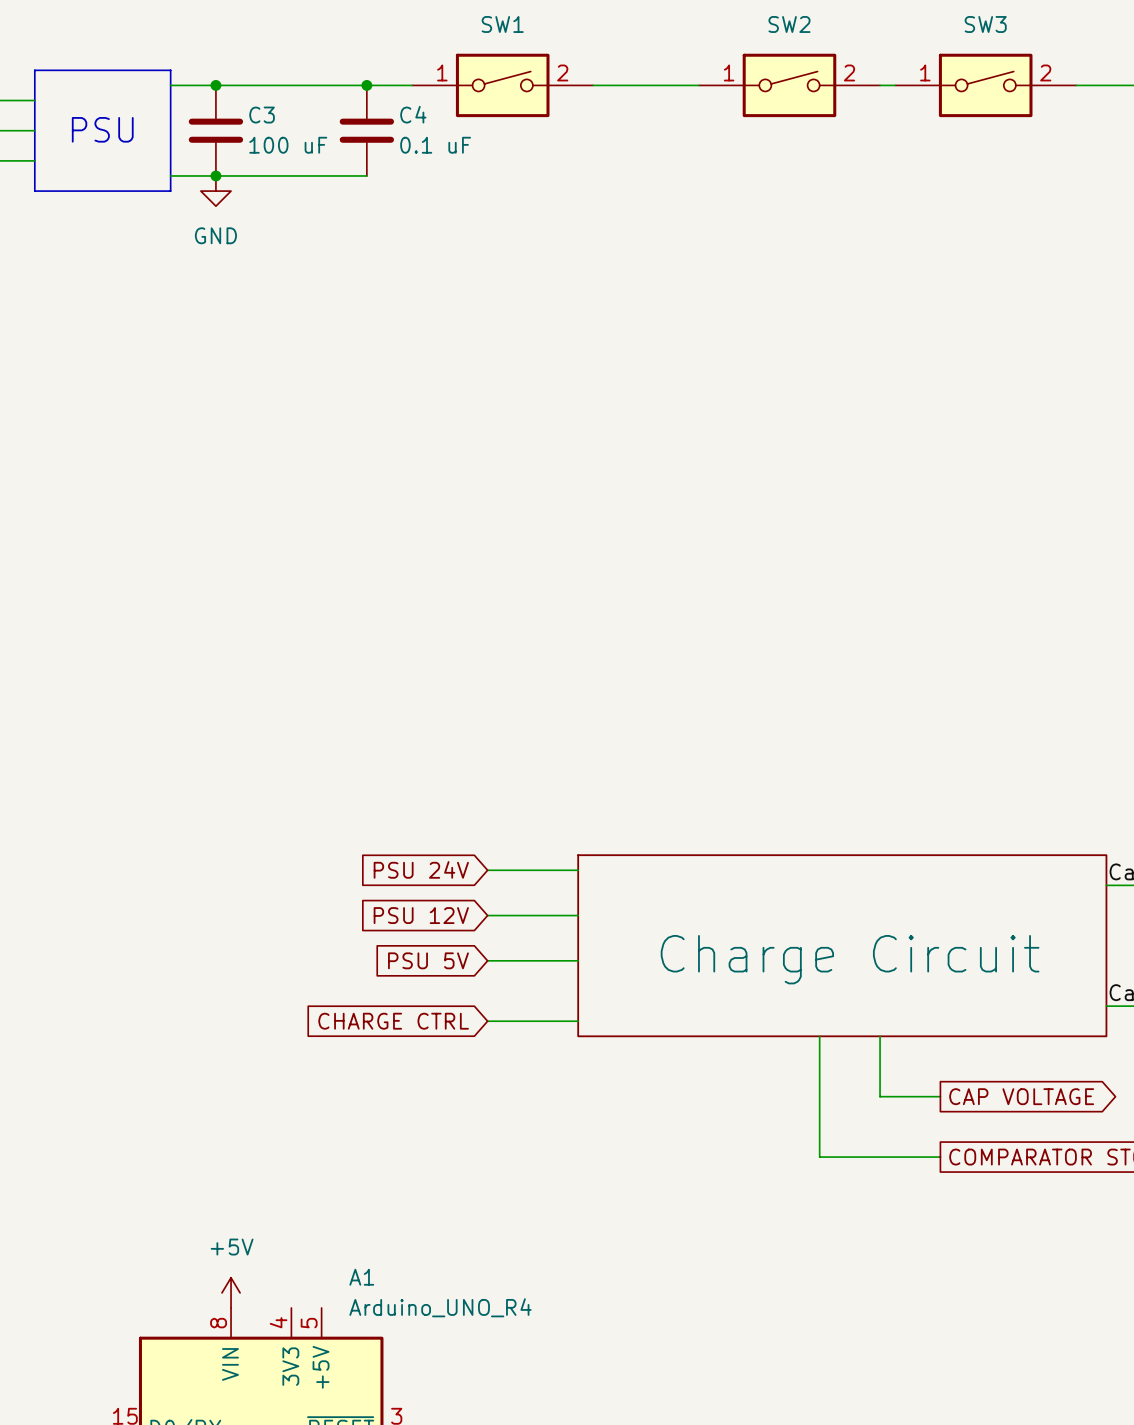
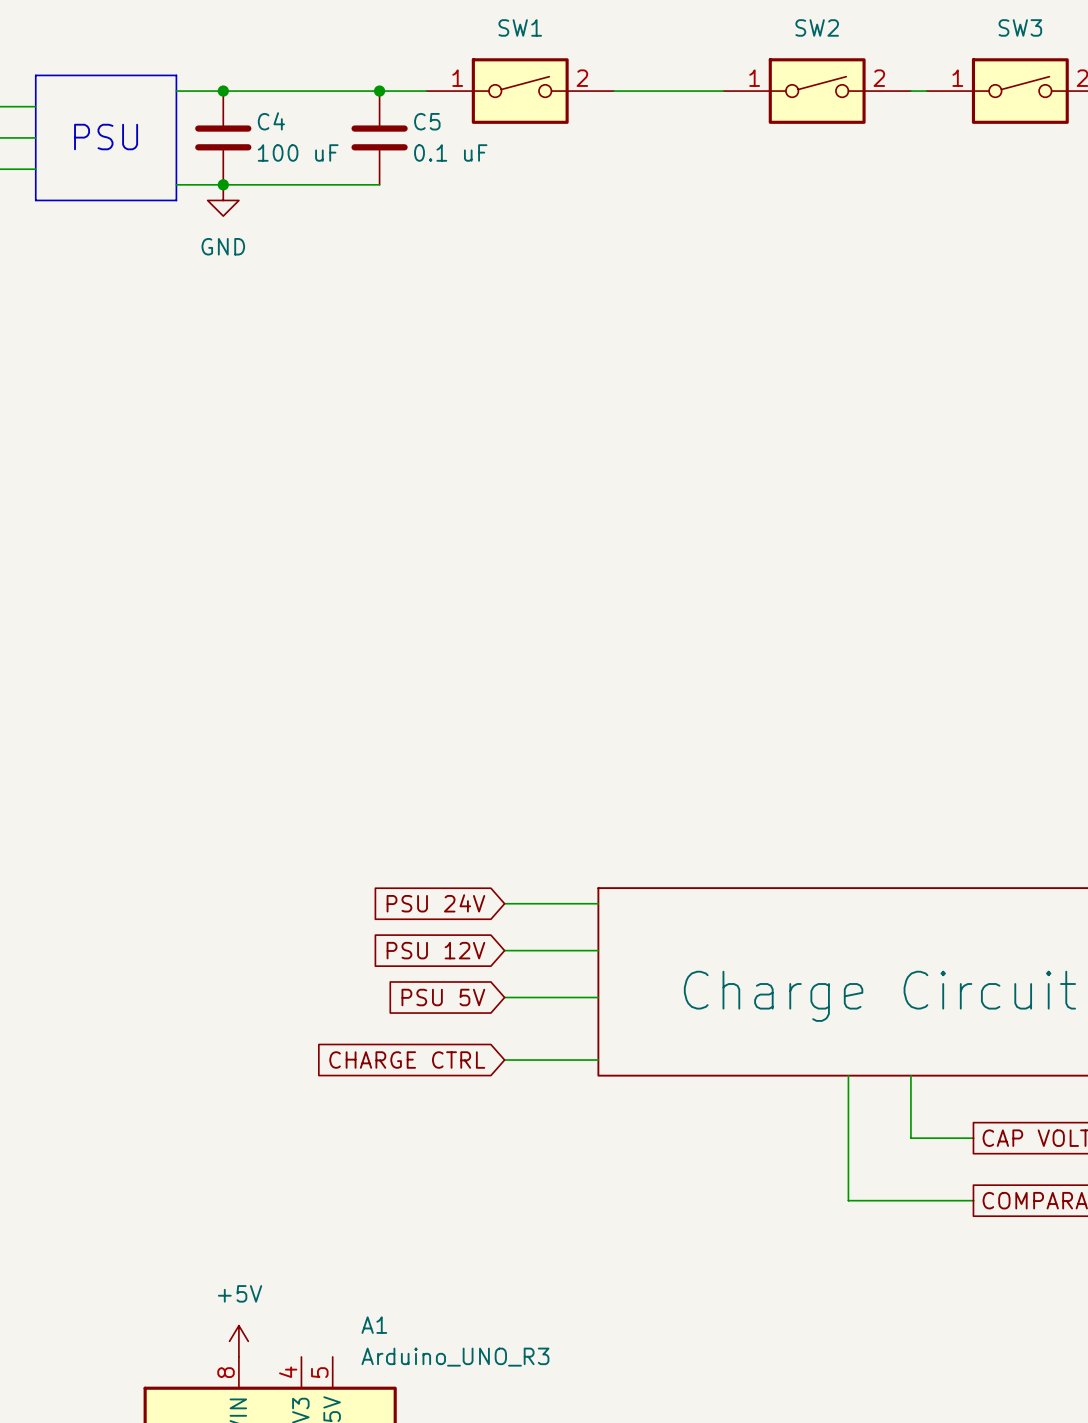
C4 name: C4 (413, 114) -> C5 (427, 121)
C3 name: C3 (262, 115) -> C4 (271, 121)
A1 value: Arduino_UNO_R4 (440, 1307) -> Arduino_UNO_R3 (455, 1357)

